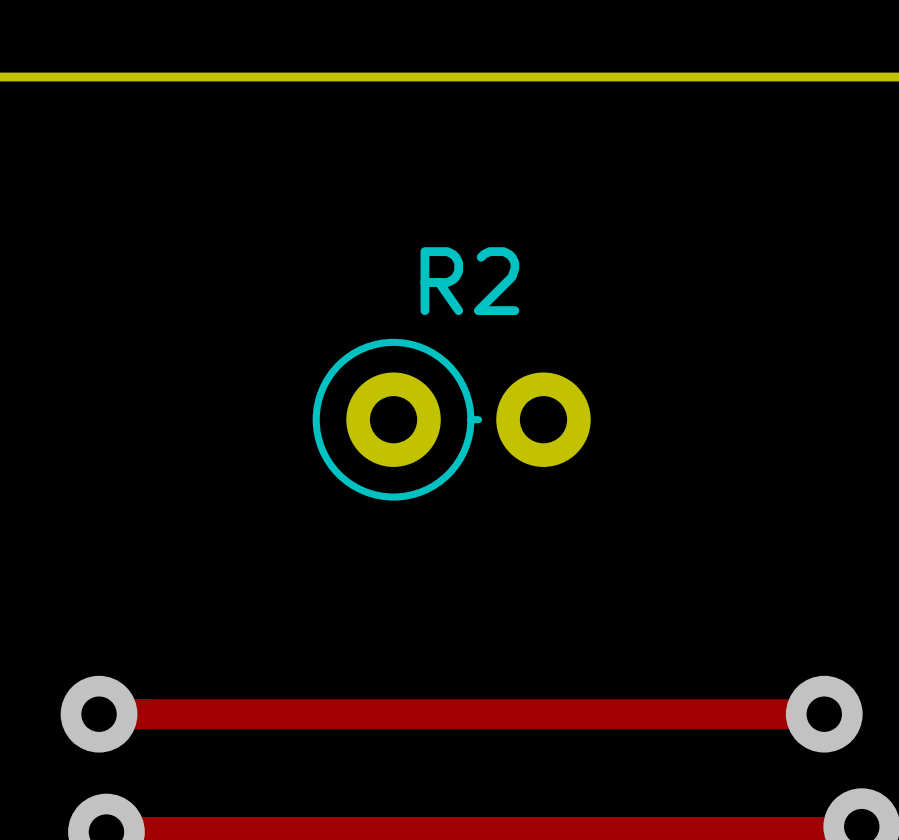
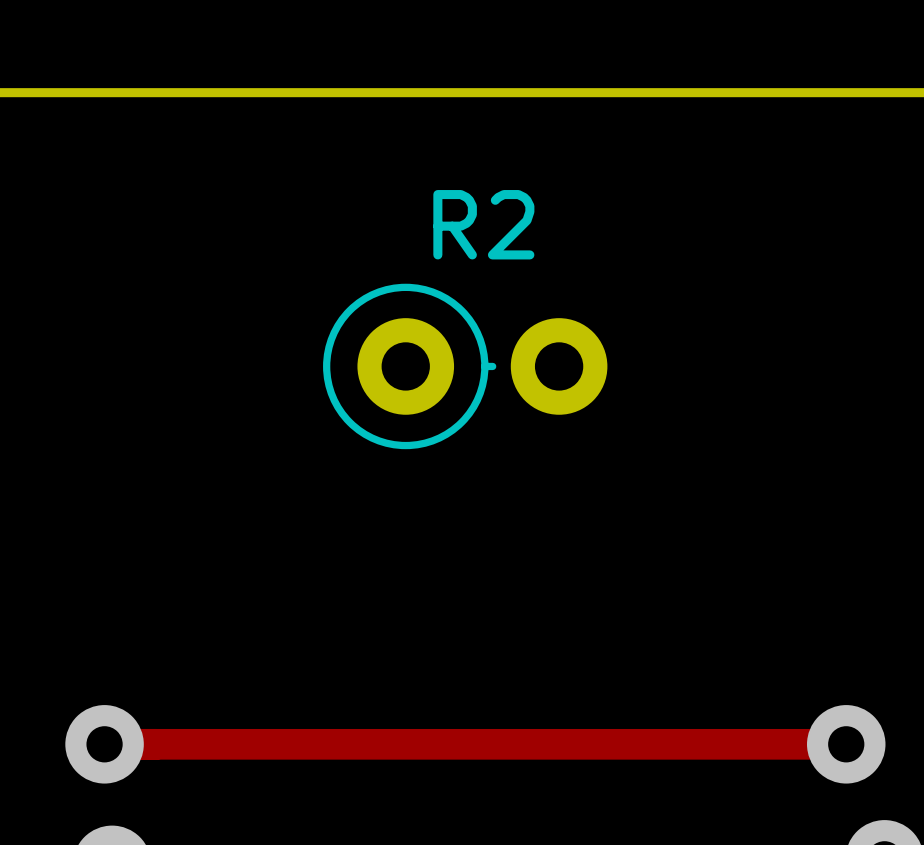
R2 position: (451, 419) -> (465, 366)

